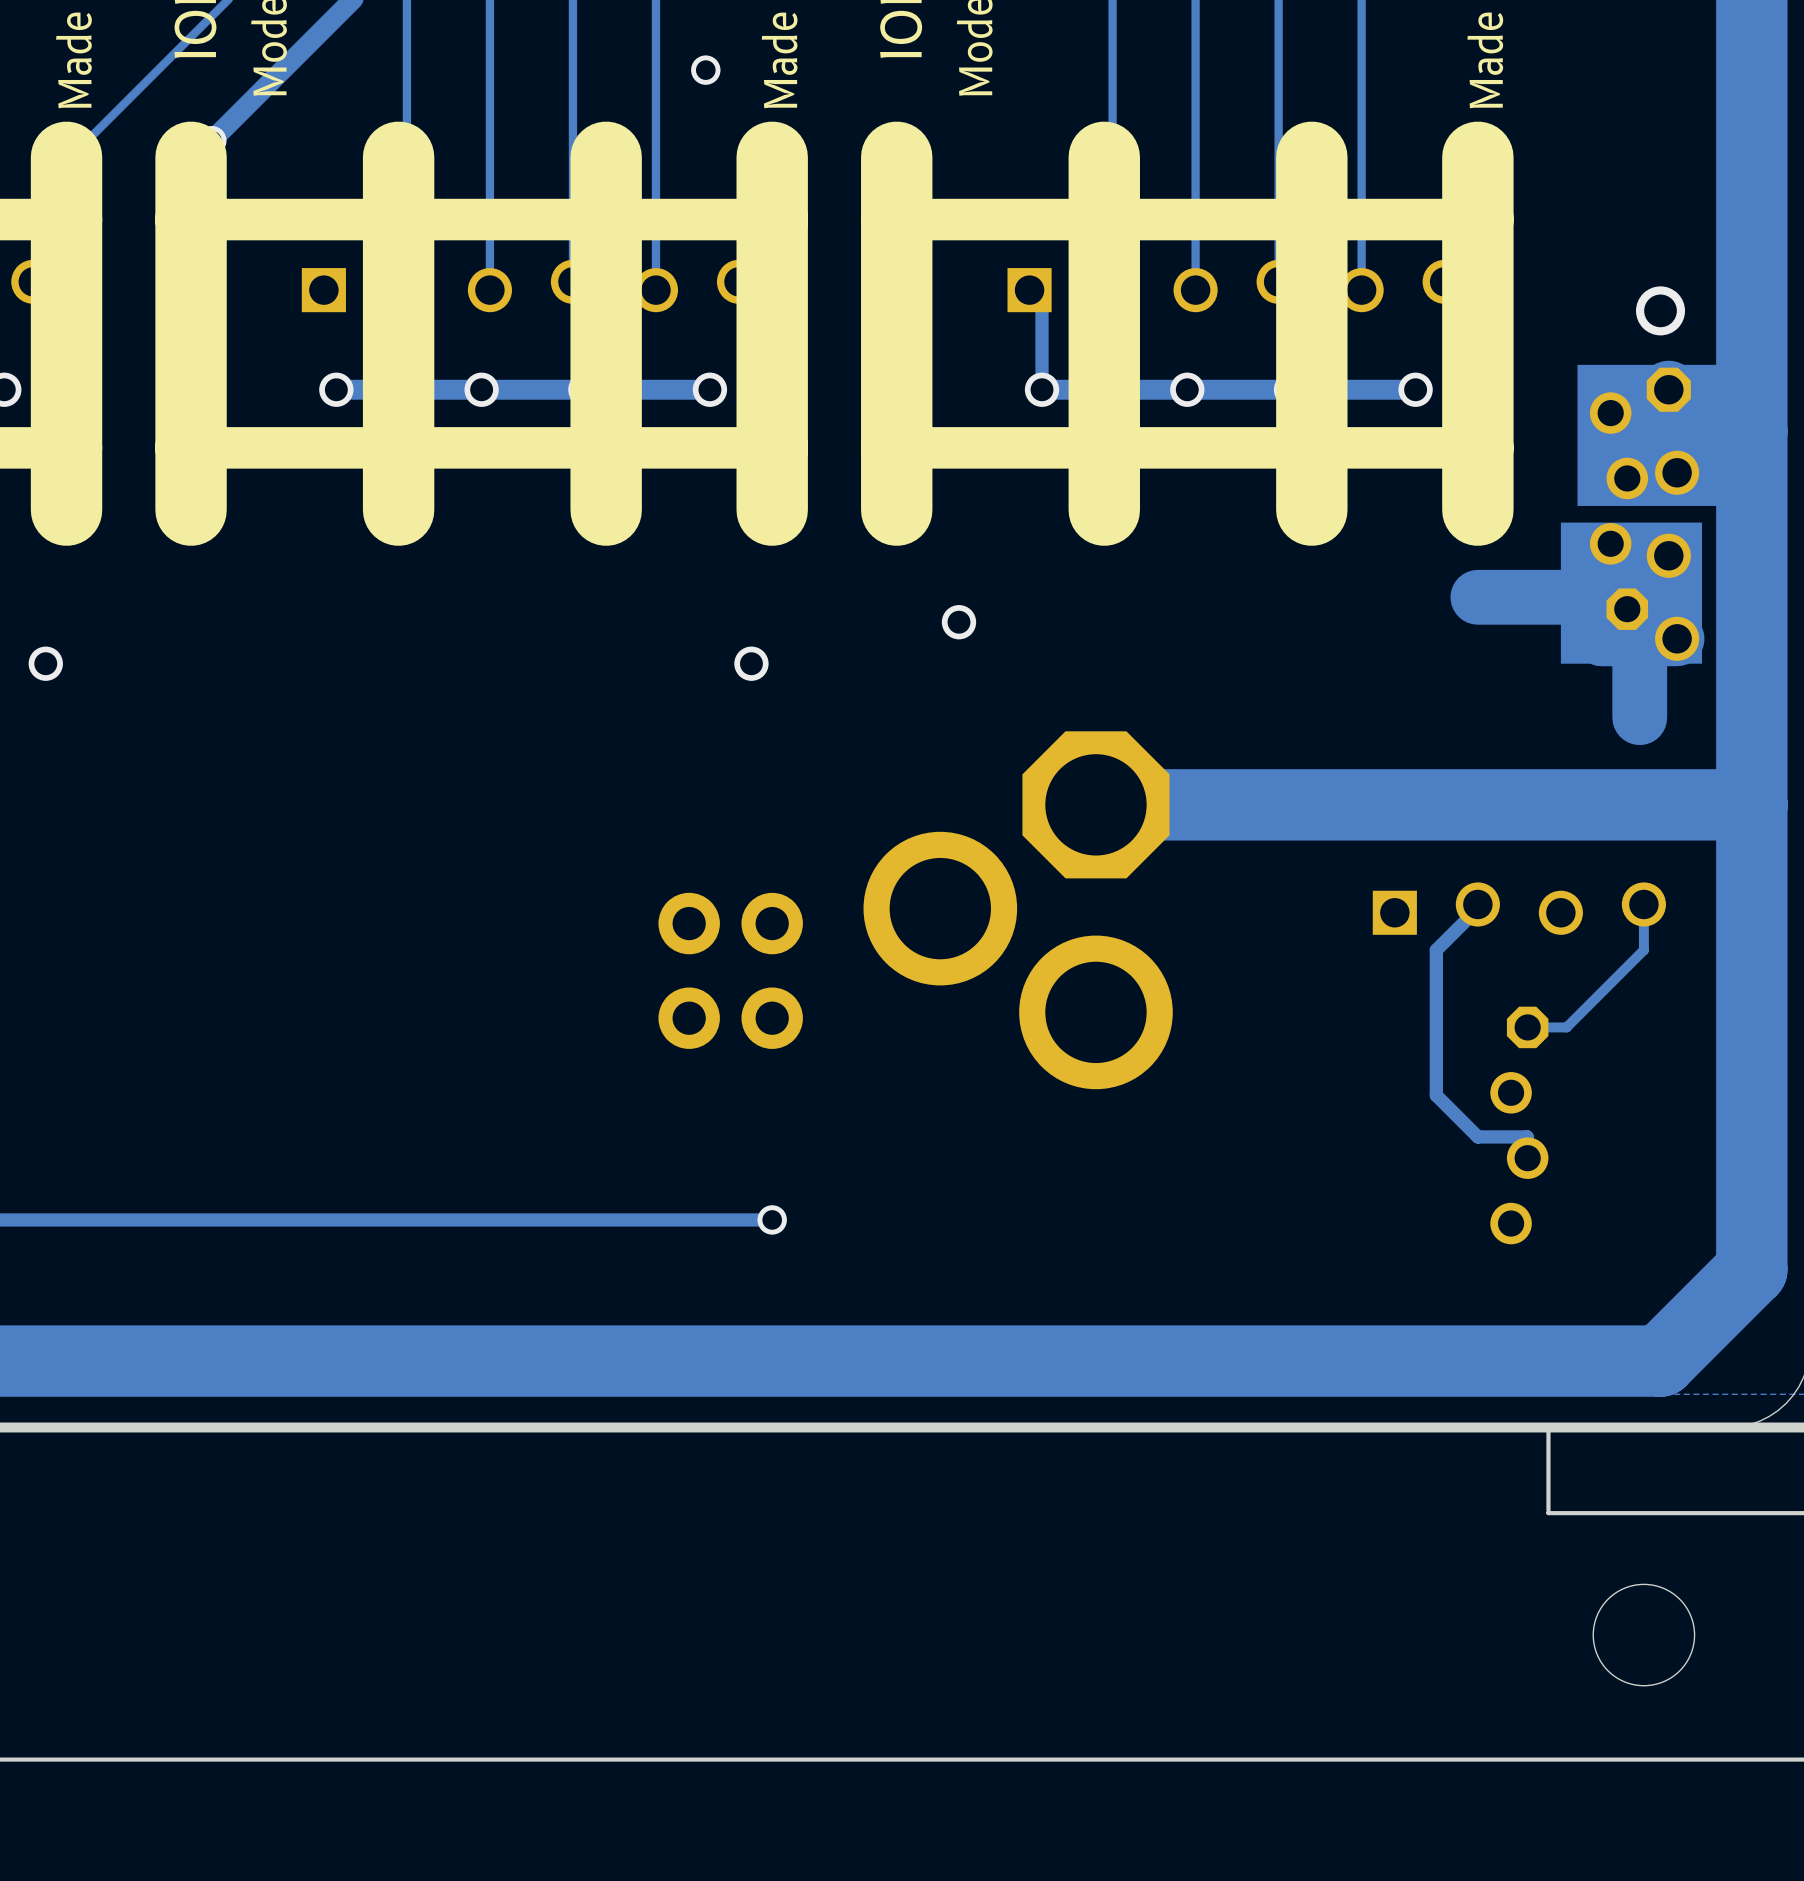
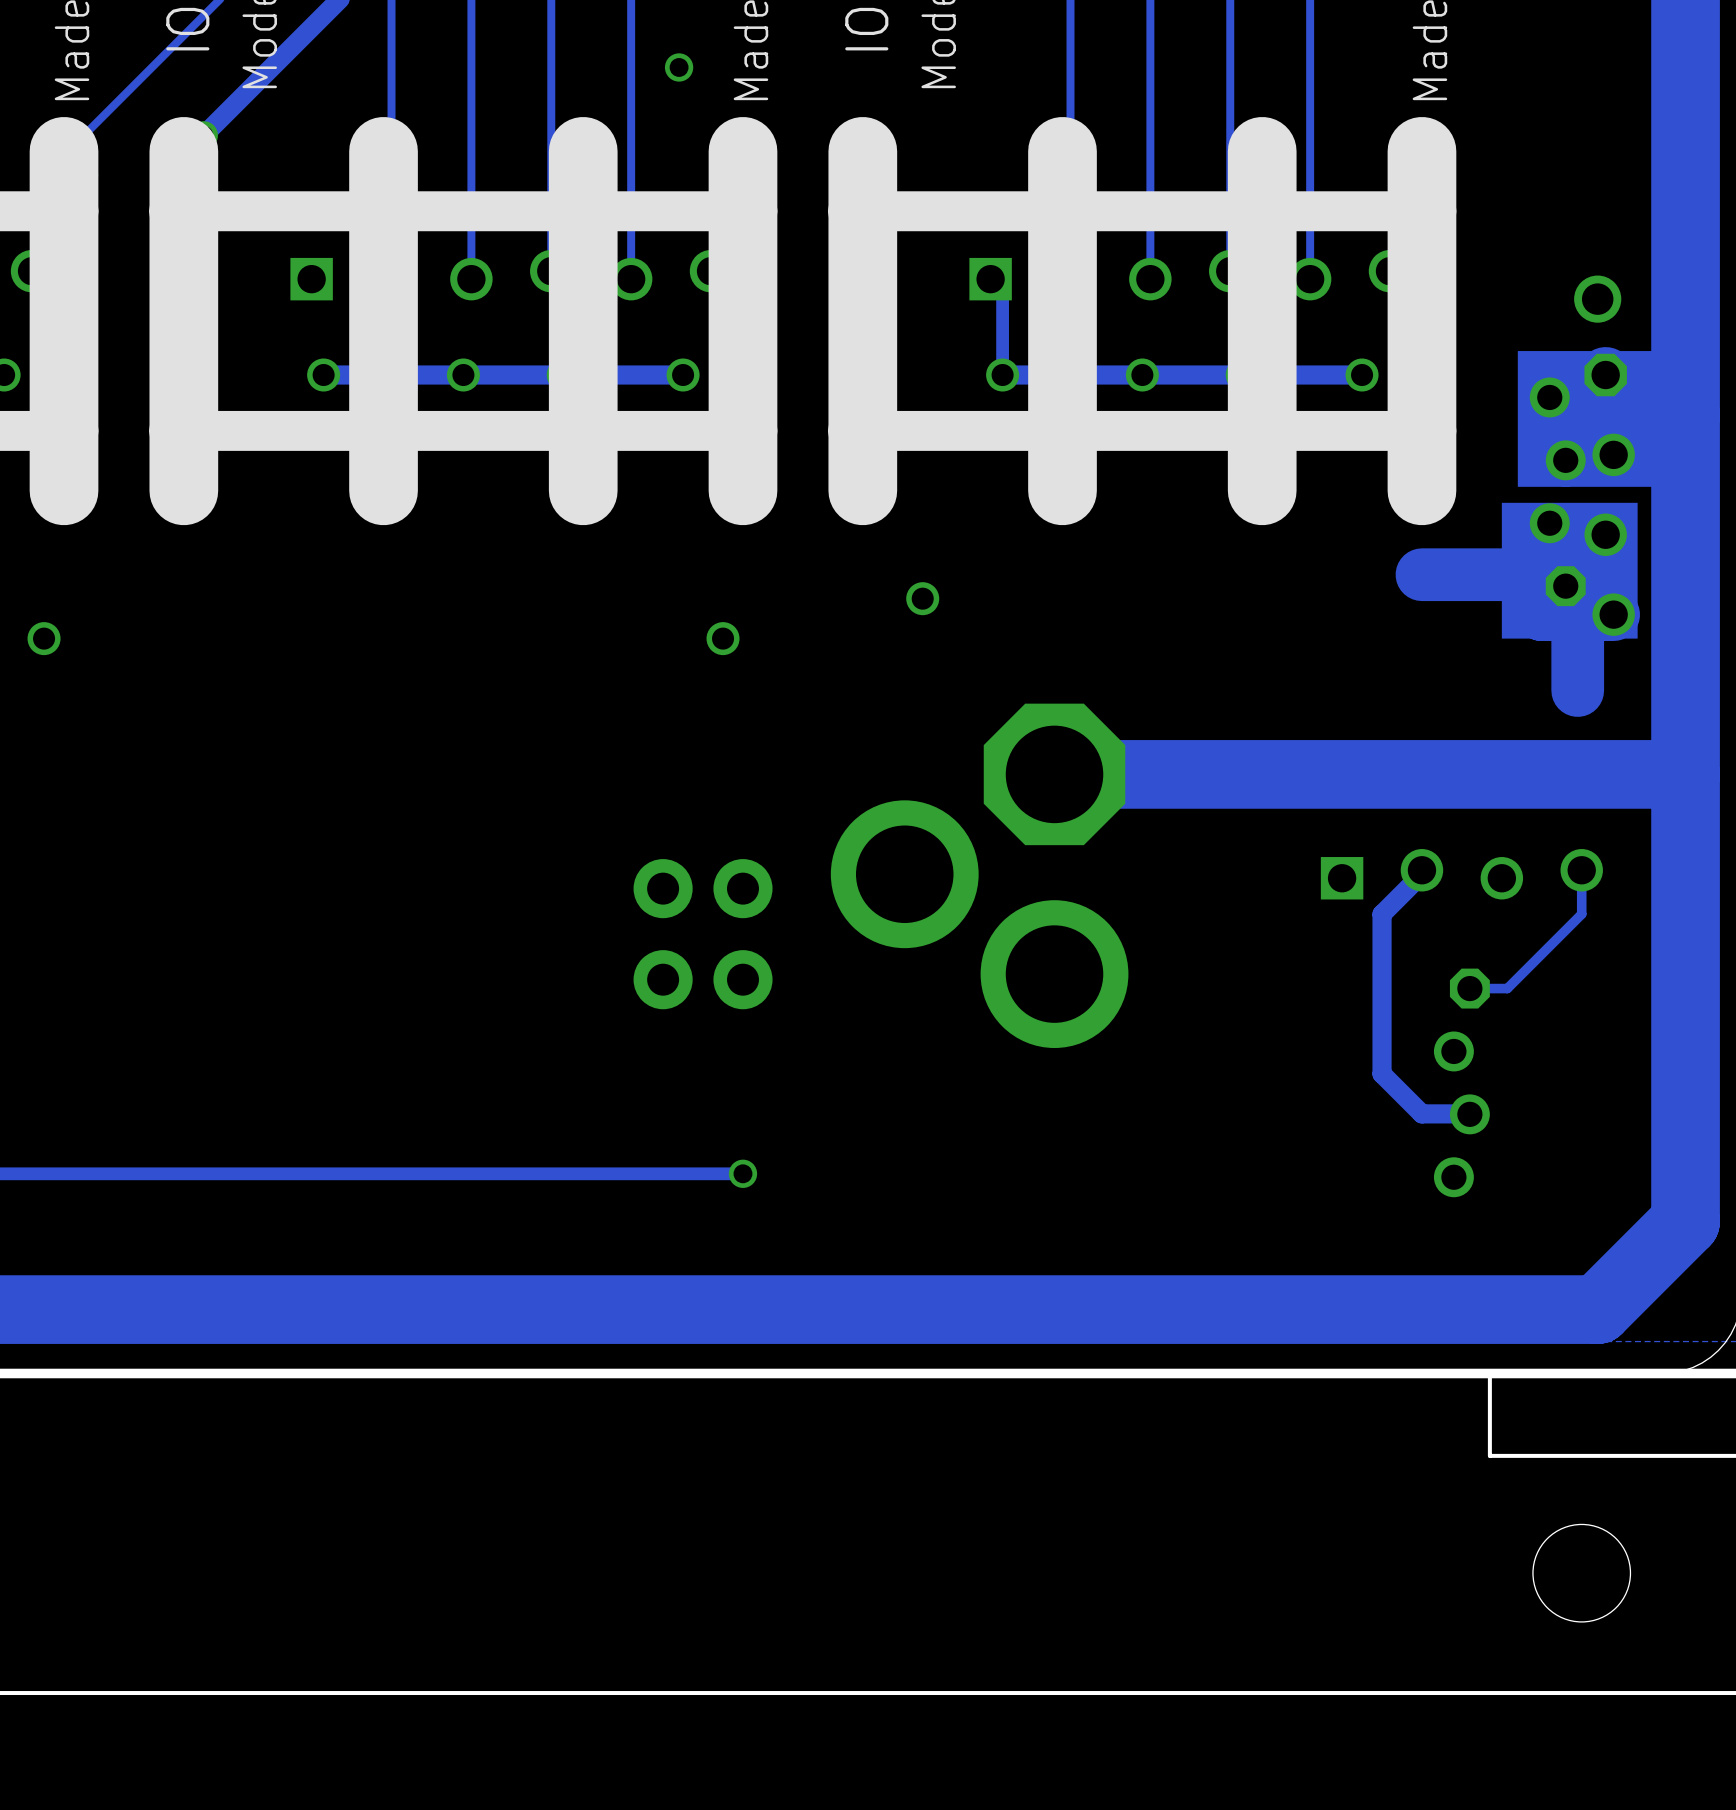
track width: thin (1477, 908) (1436, 950) (1436, 1095) -> thick (1421, 874) (1382, 914) (1382, 1053)
track: (1436, 1095) (1477, 1136) (1527, 1136) (1527, 1158) -> (1382, 1053) (1382, 1073) (1421, 1113) (1469, 1114)

